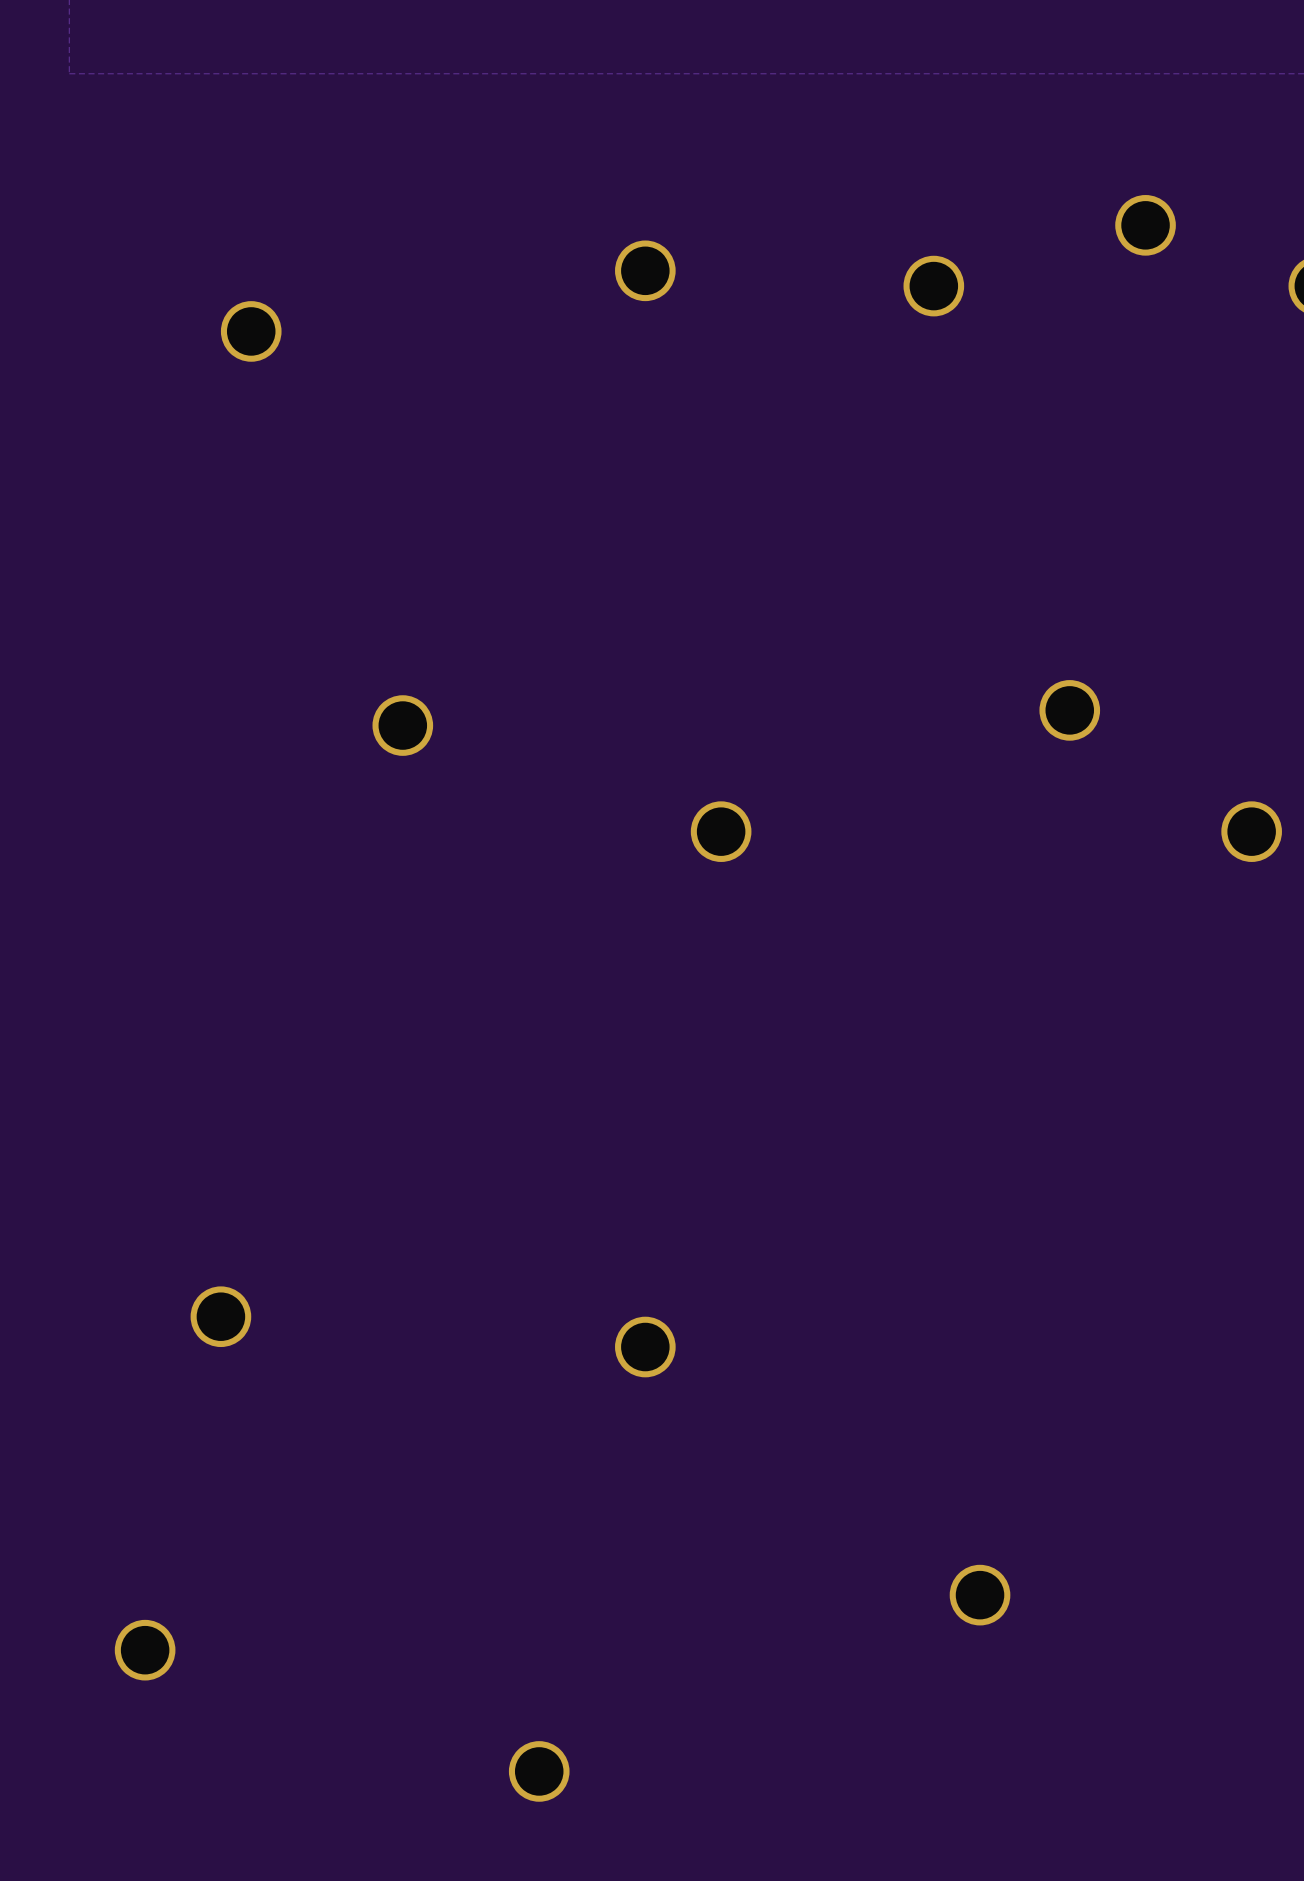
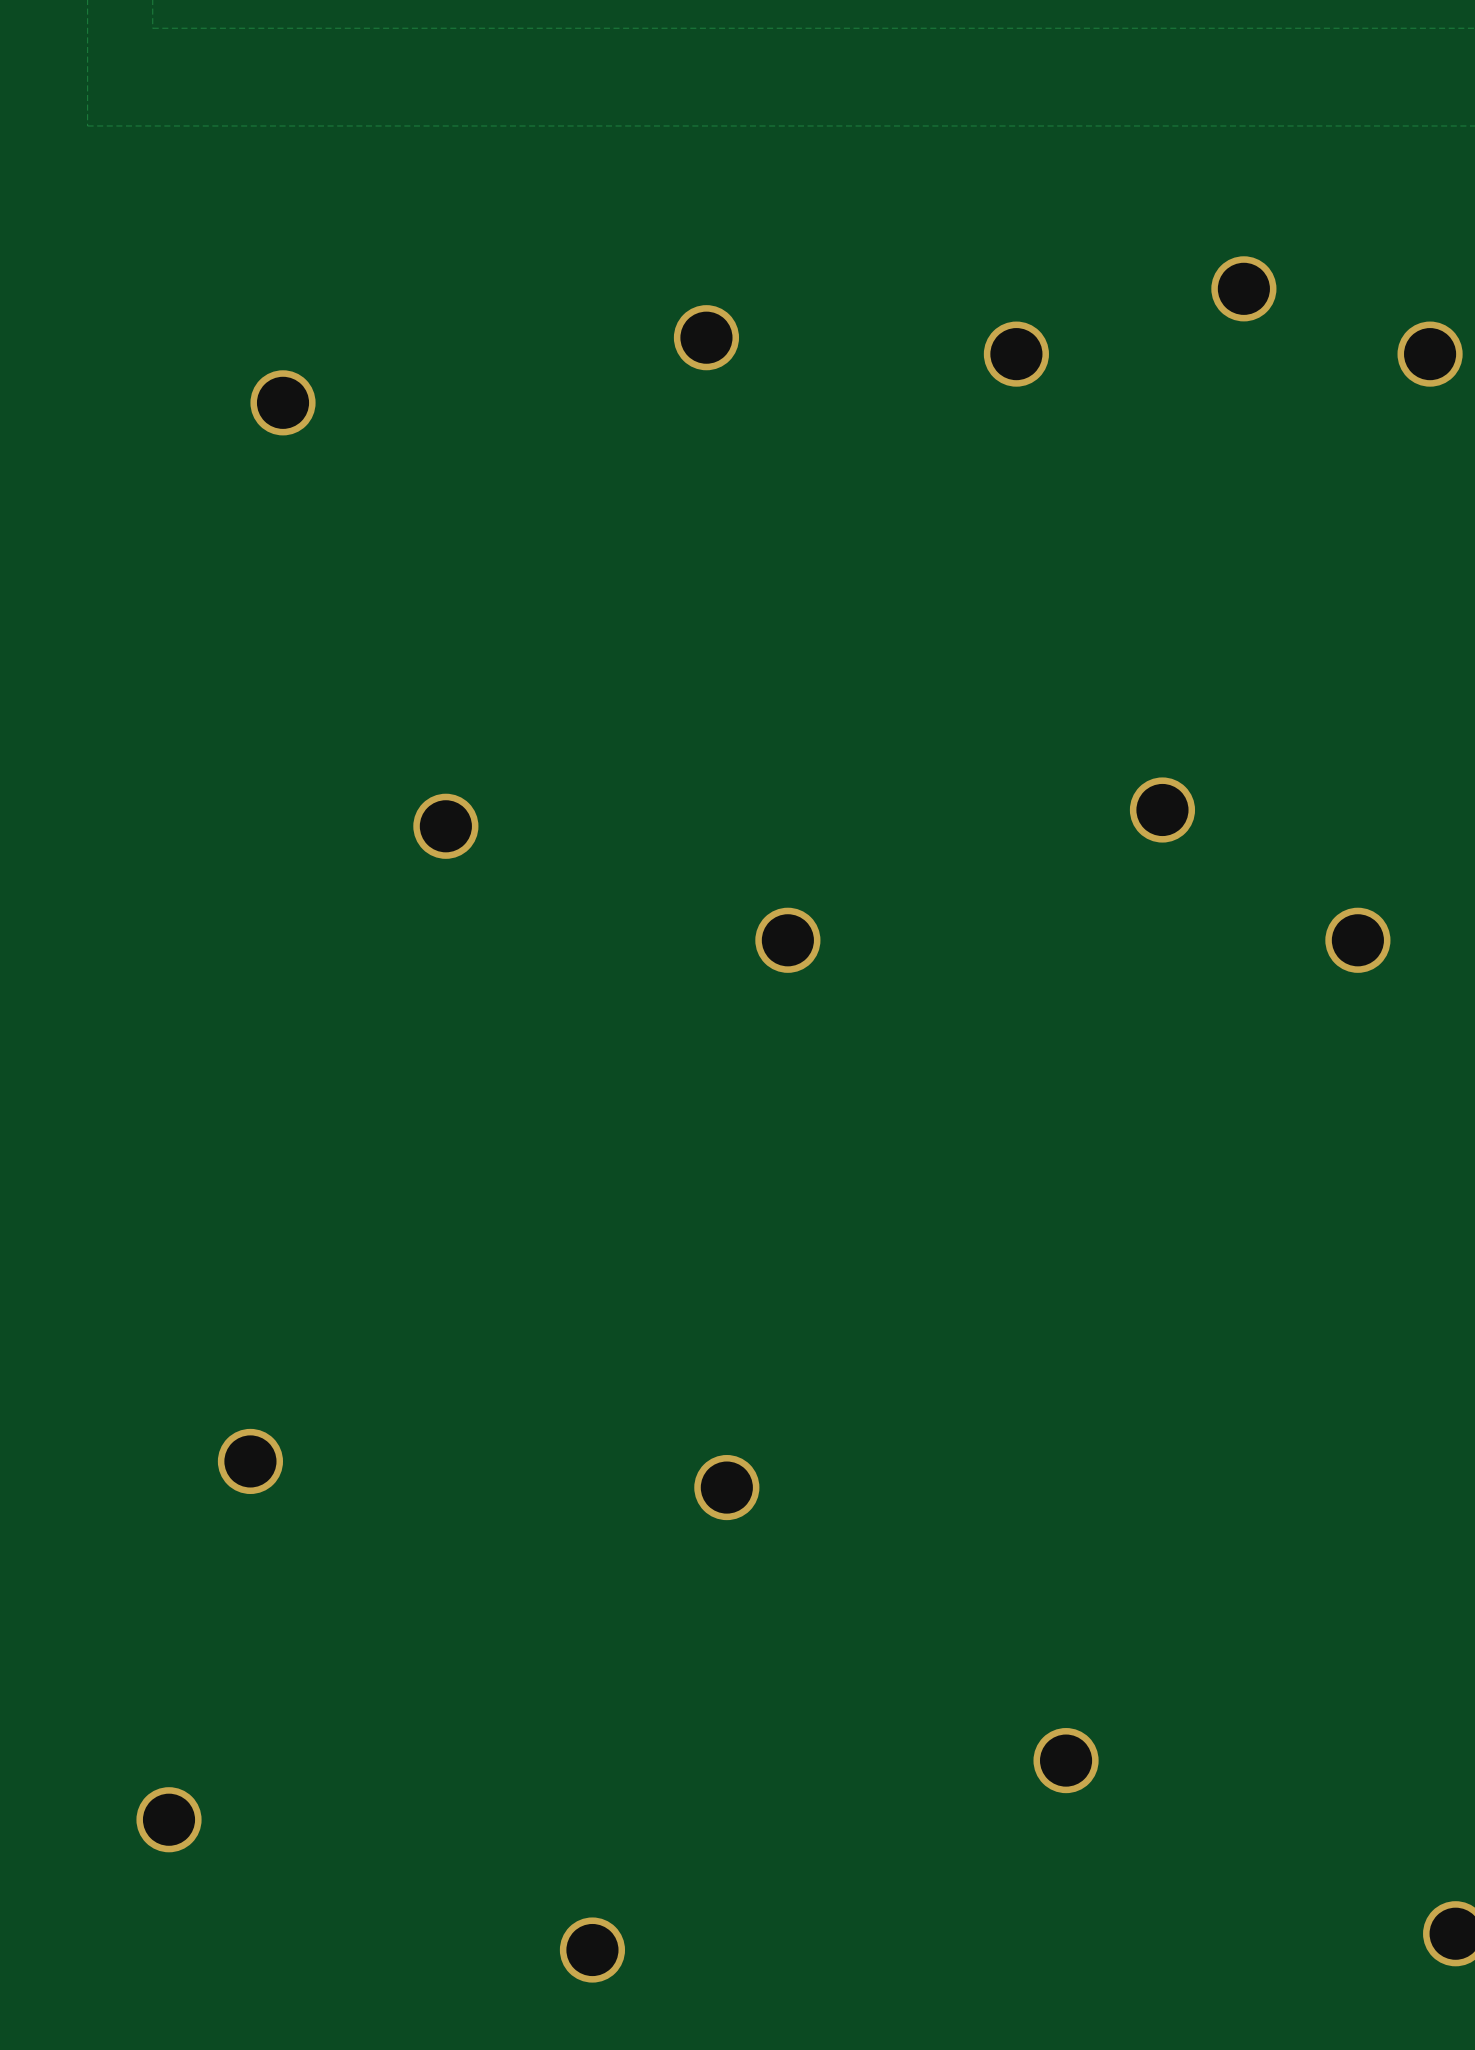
via position: (645, 1347) -> (726, 1487)

